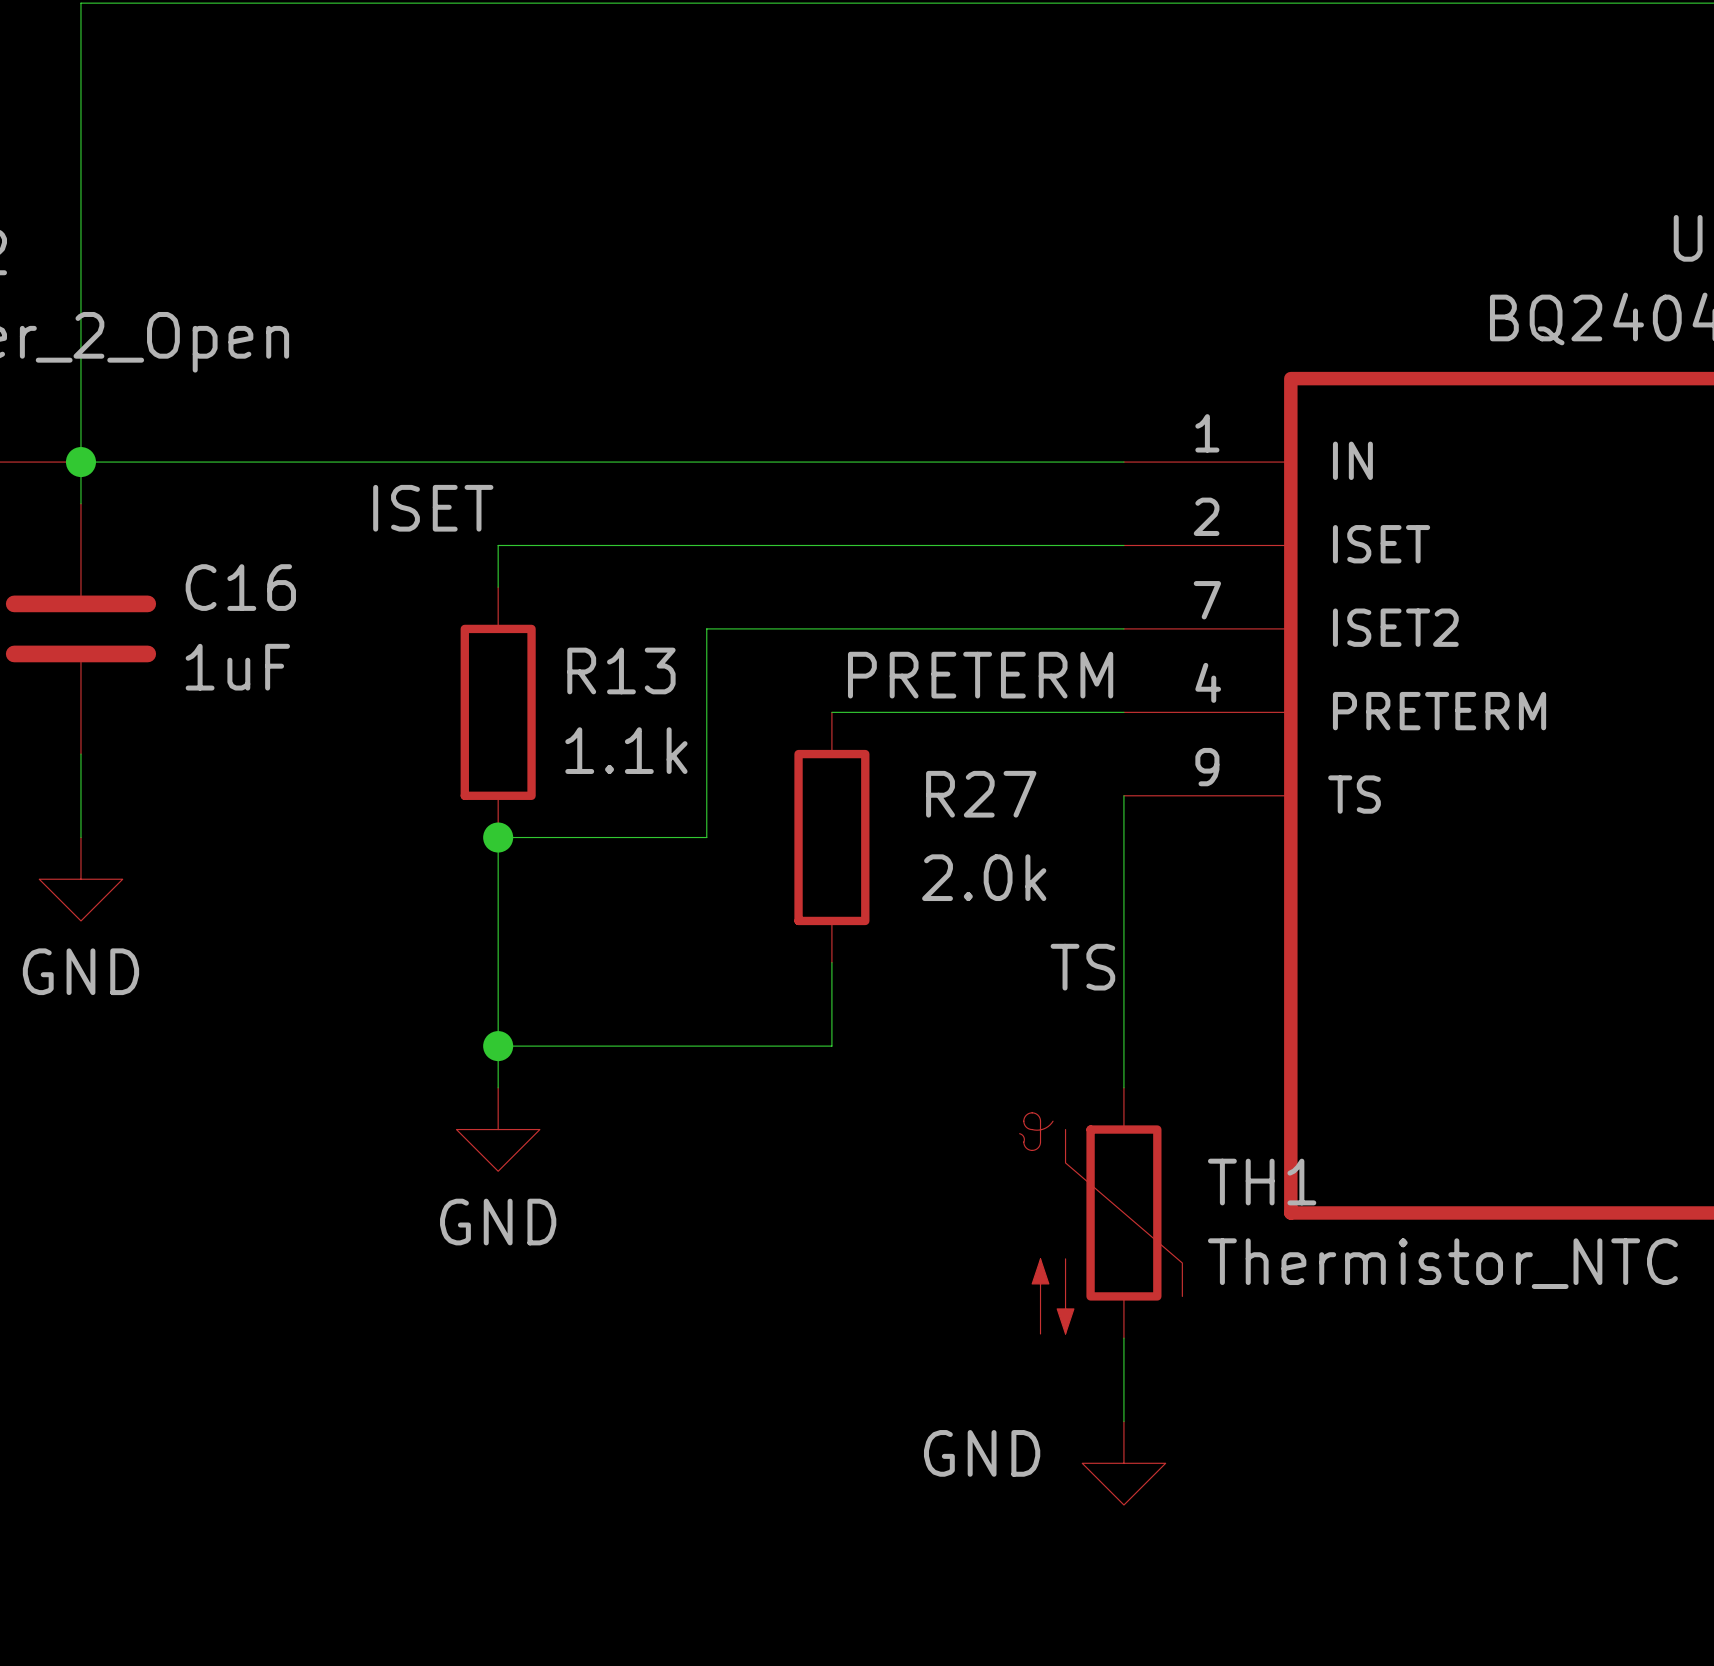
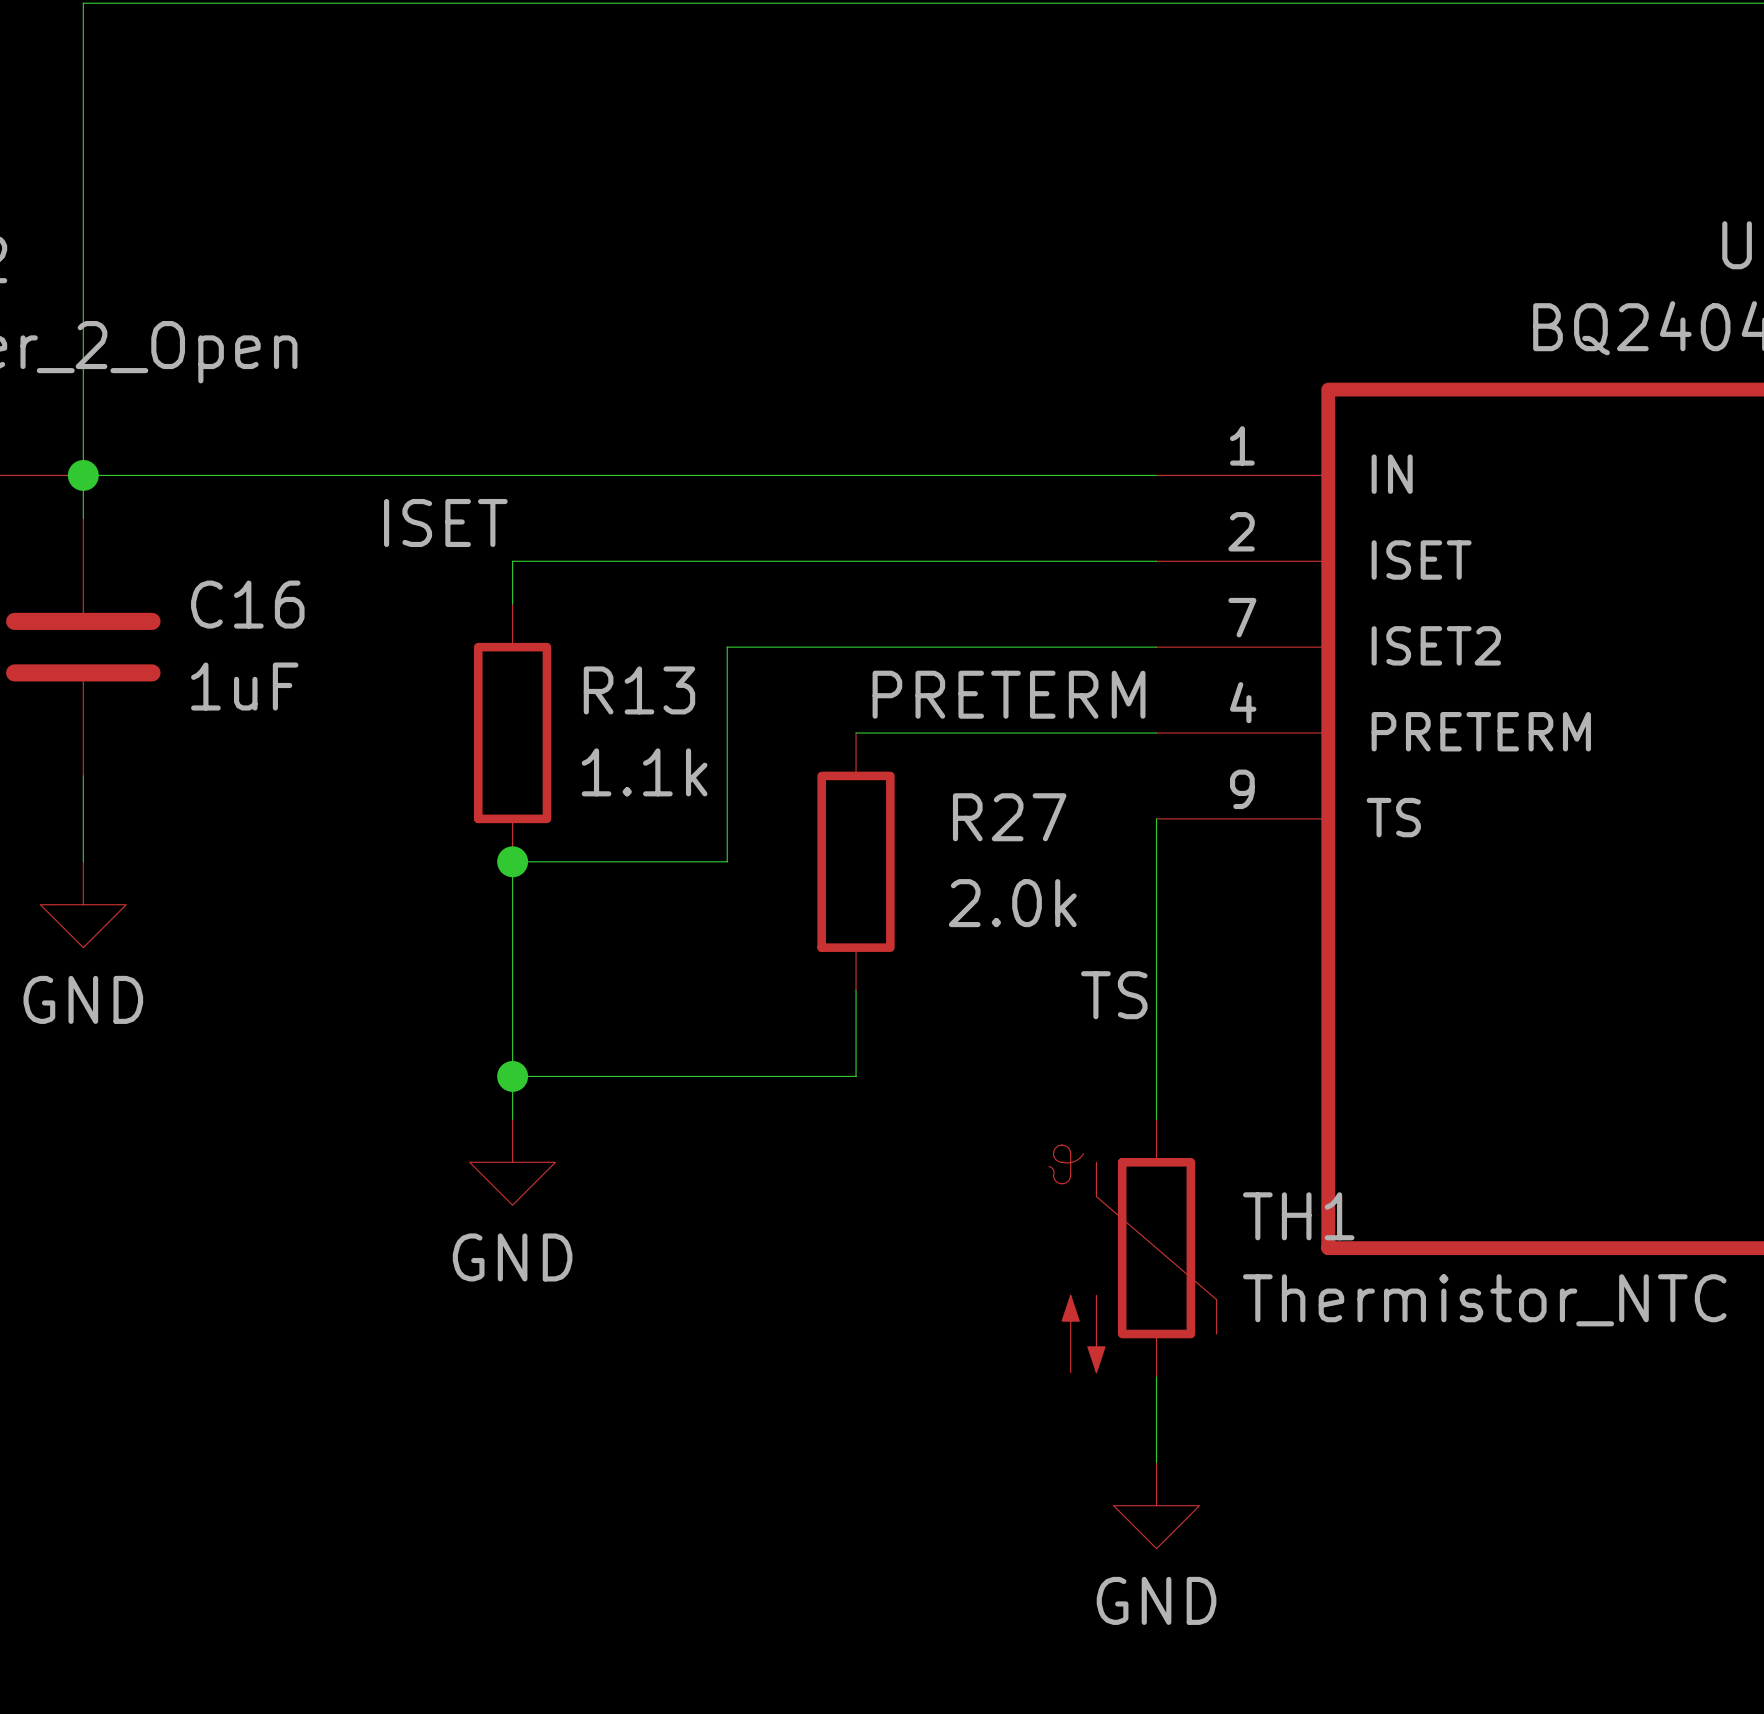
power symbol text position: GND (982, 1453) -> GND (1156, 1600)

